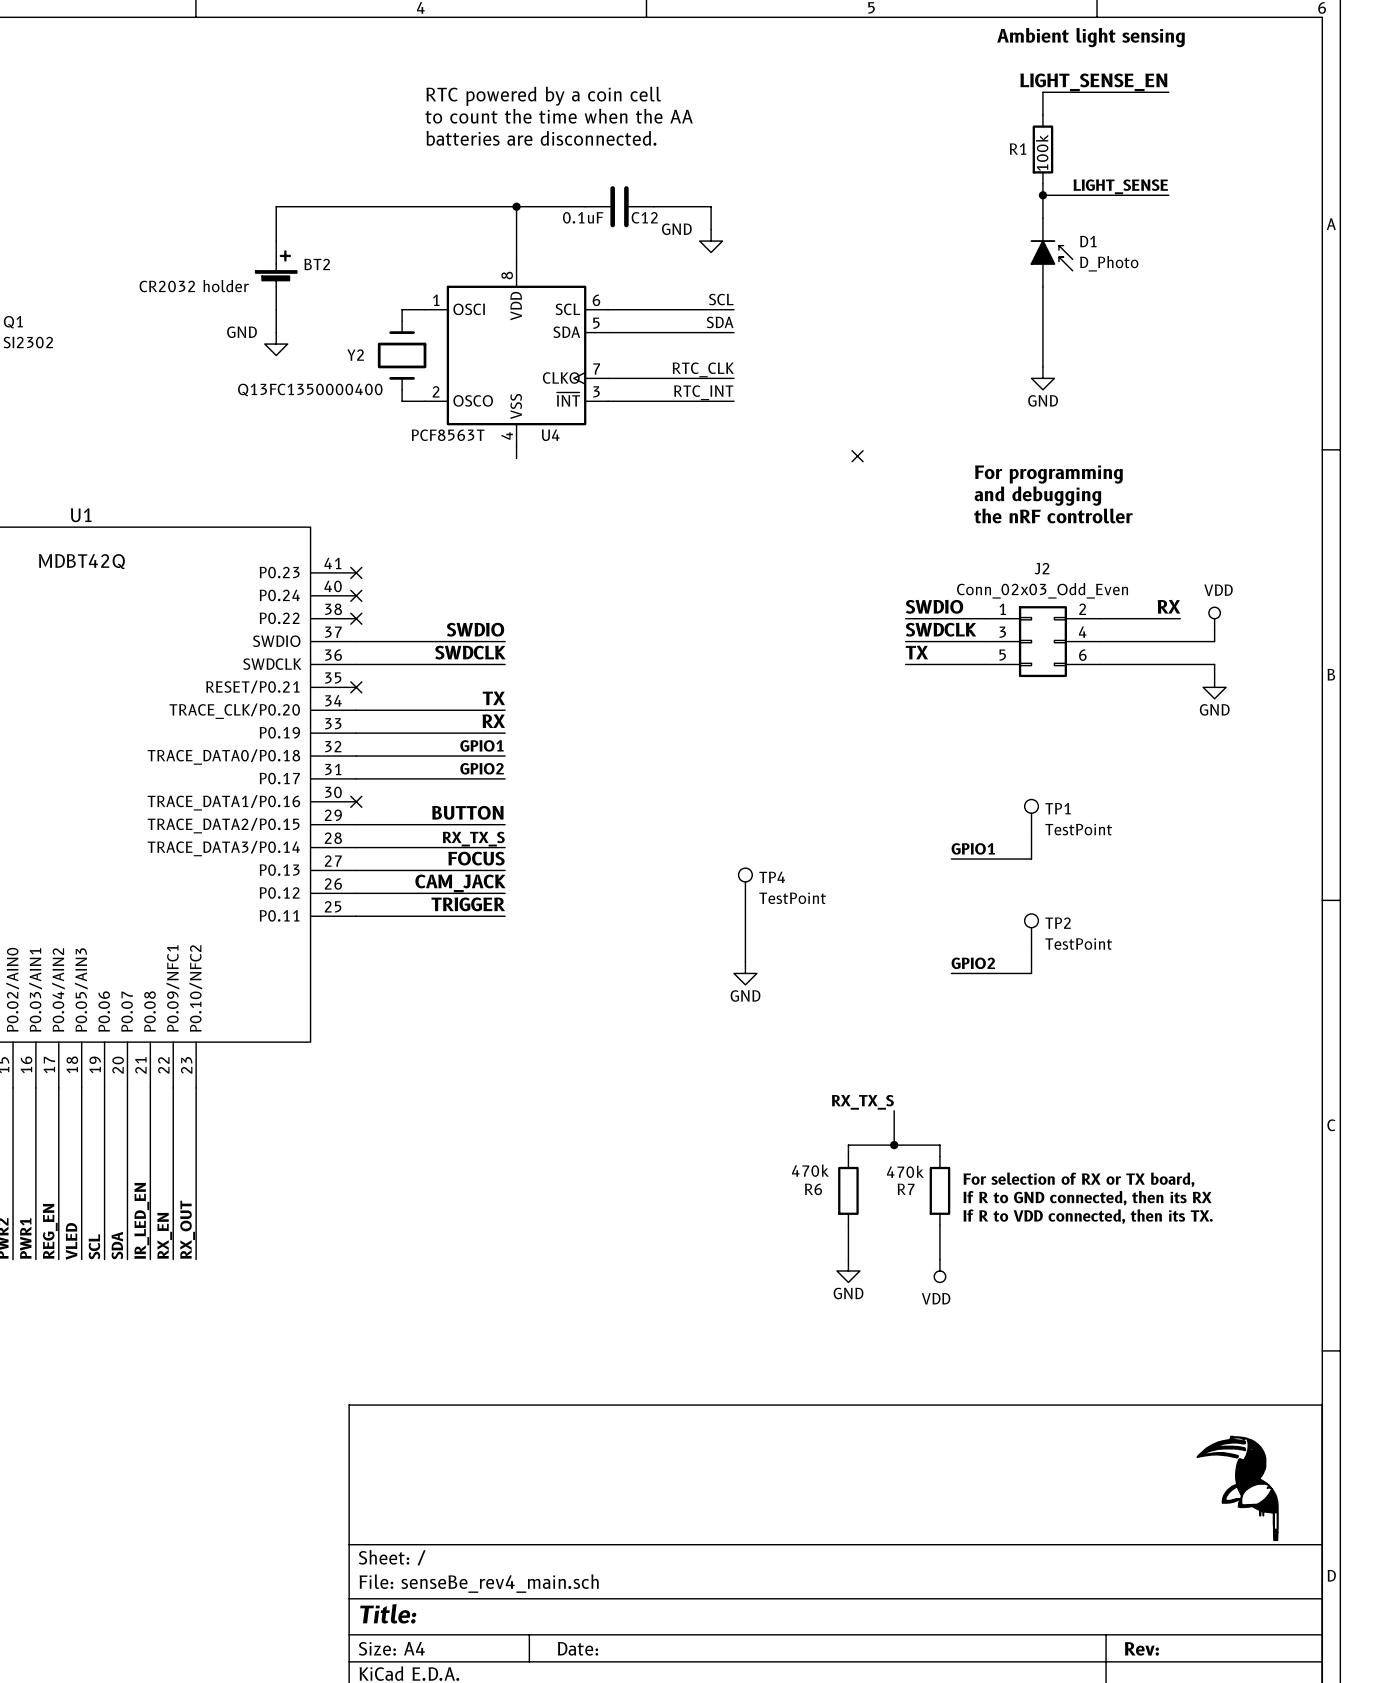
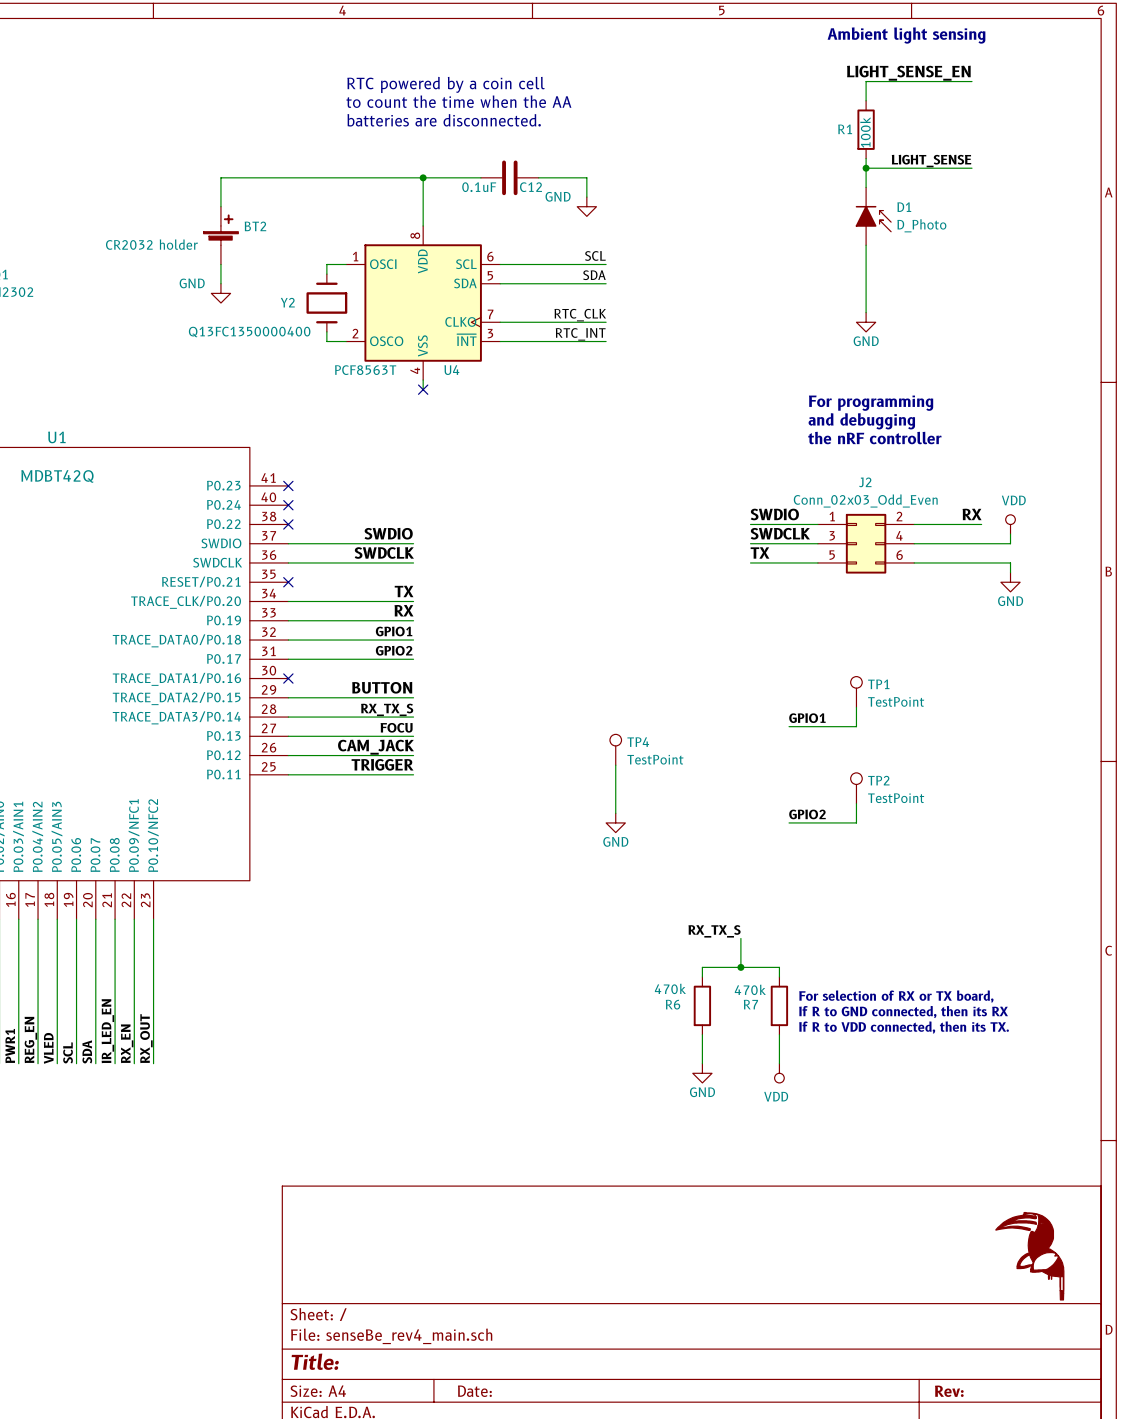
no-connect mark: (857, 456) -> none
no-connect mark: none -> (423, 389)
label: FOCUS (476, 858) -> FOCU (396, 727)

